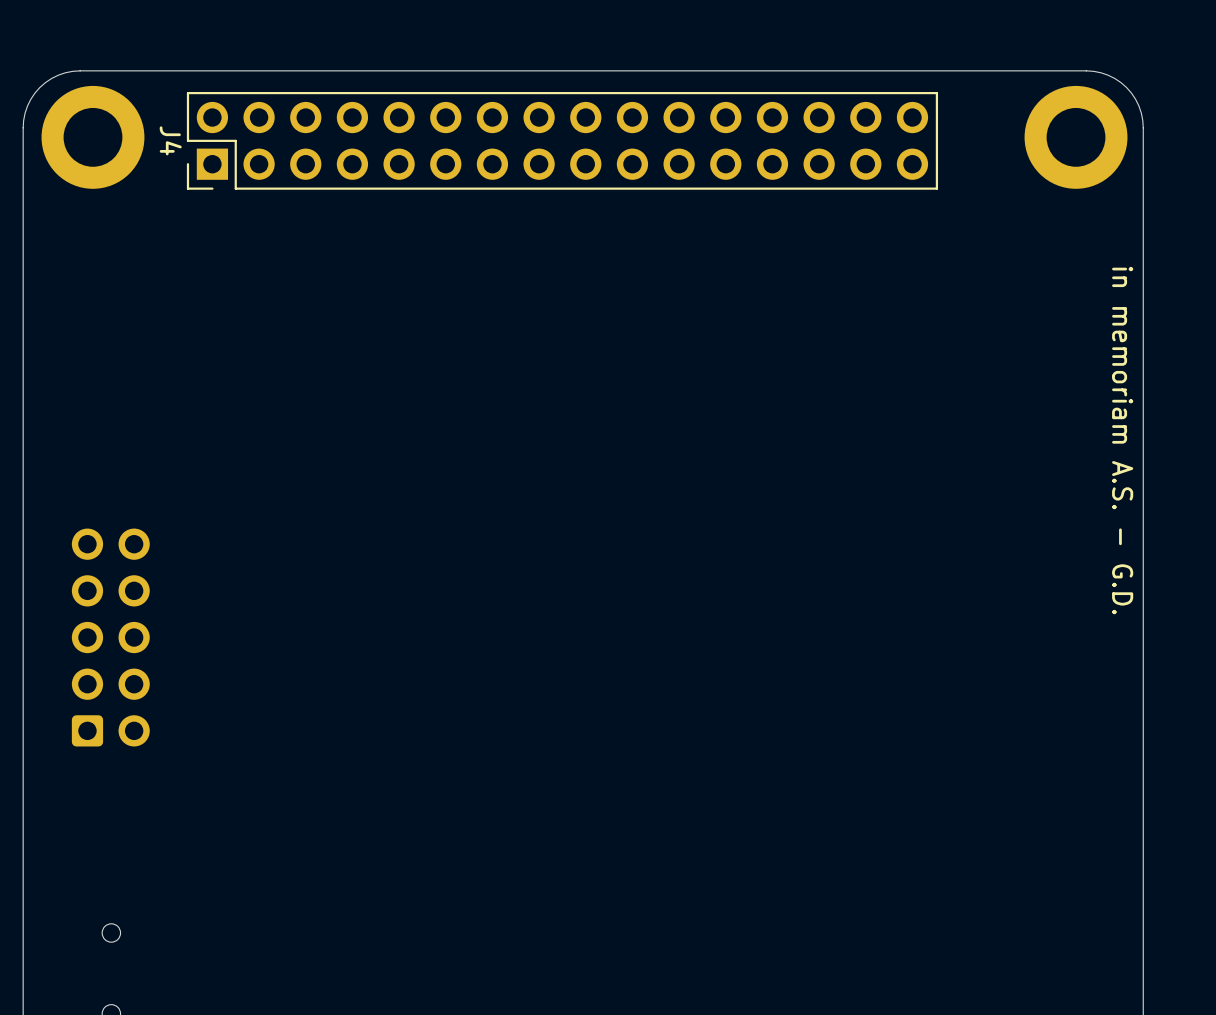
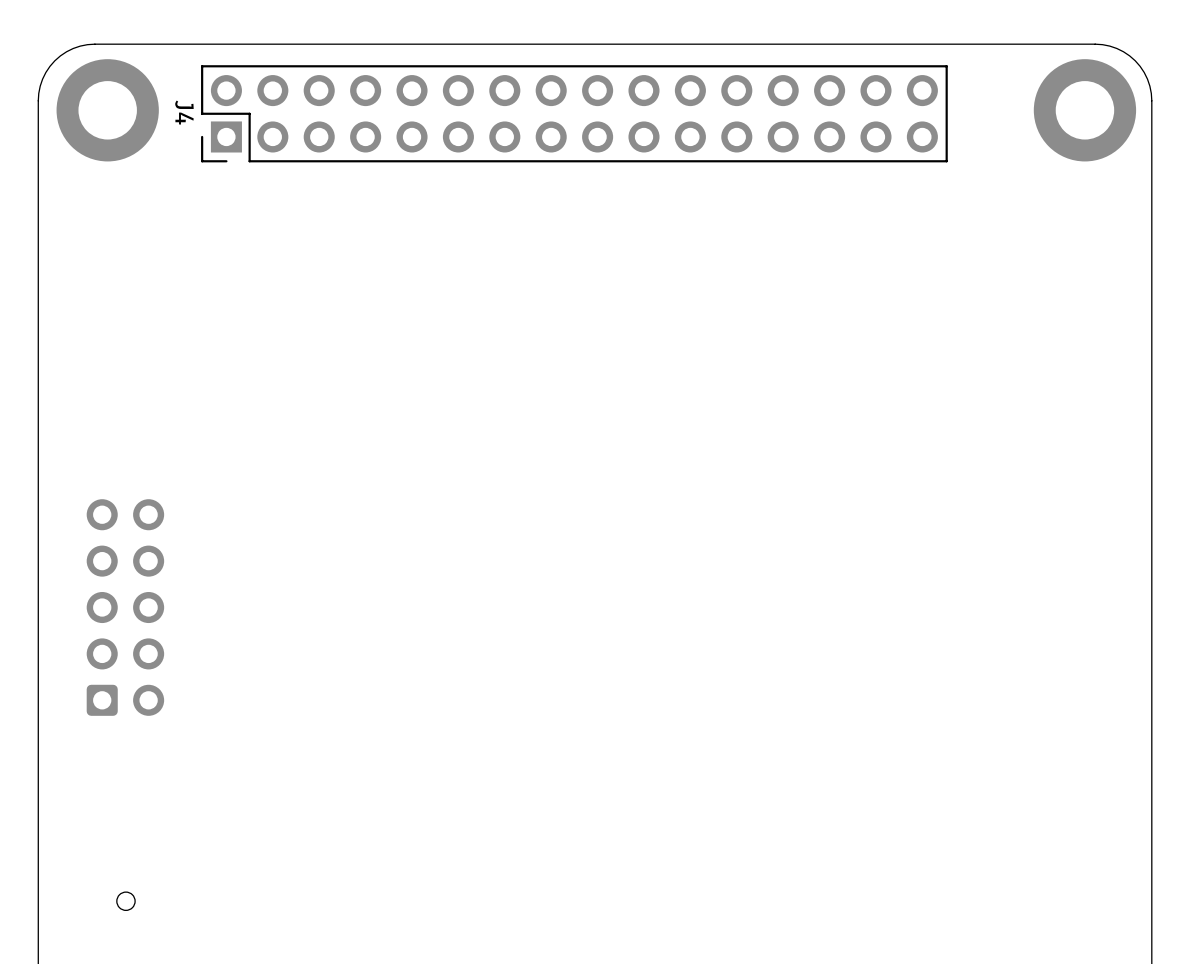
text: in memoriam A.S. - G.D. (1122, 440) -> none

